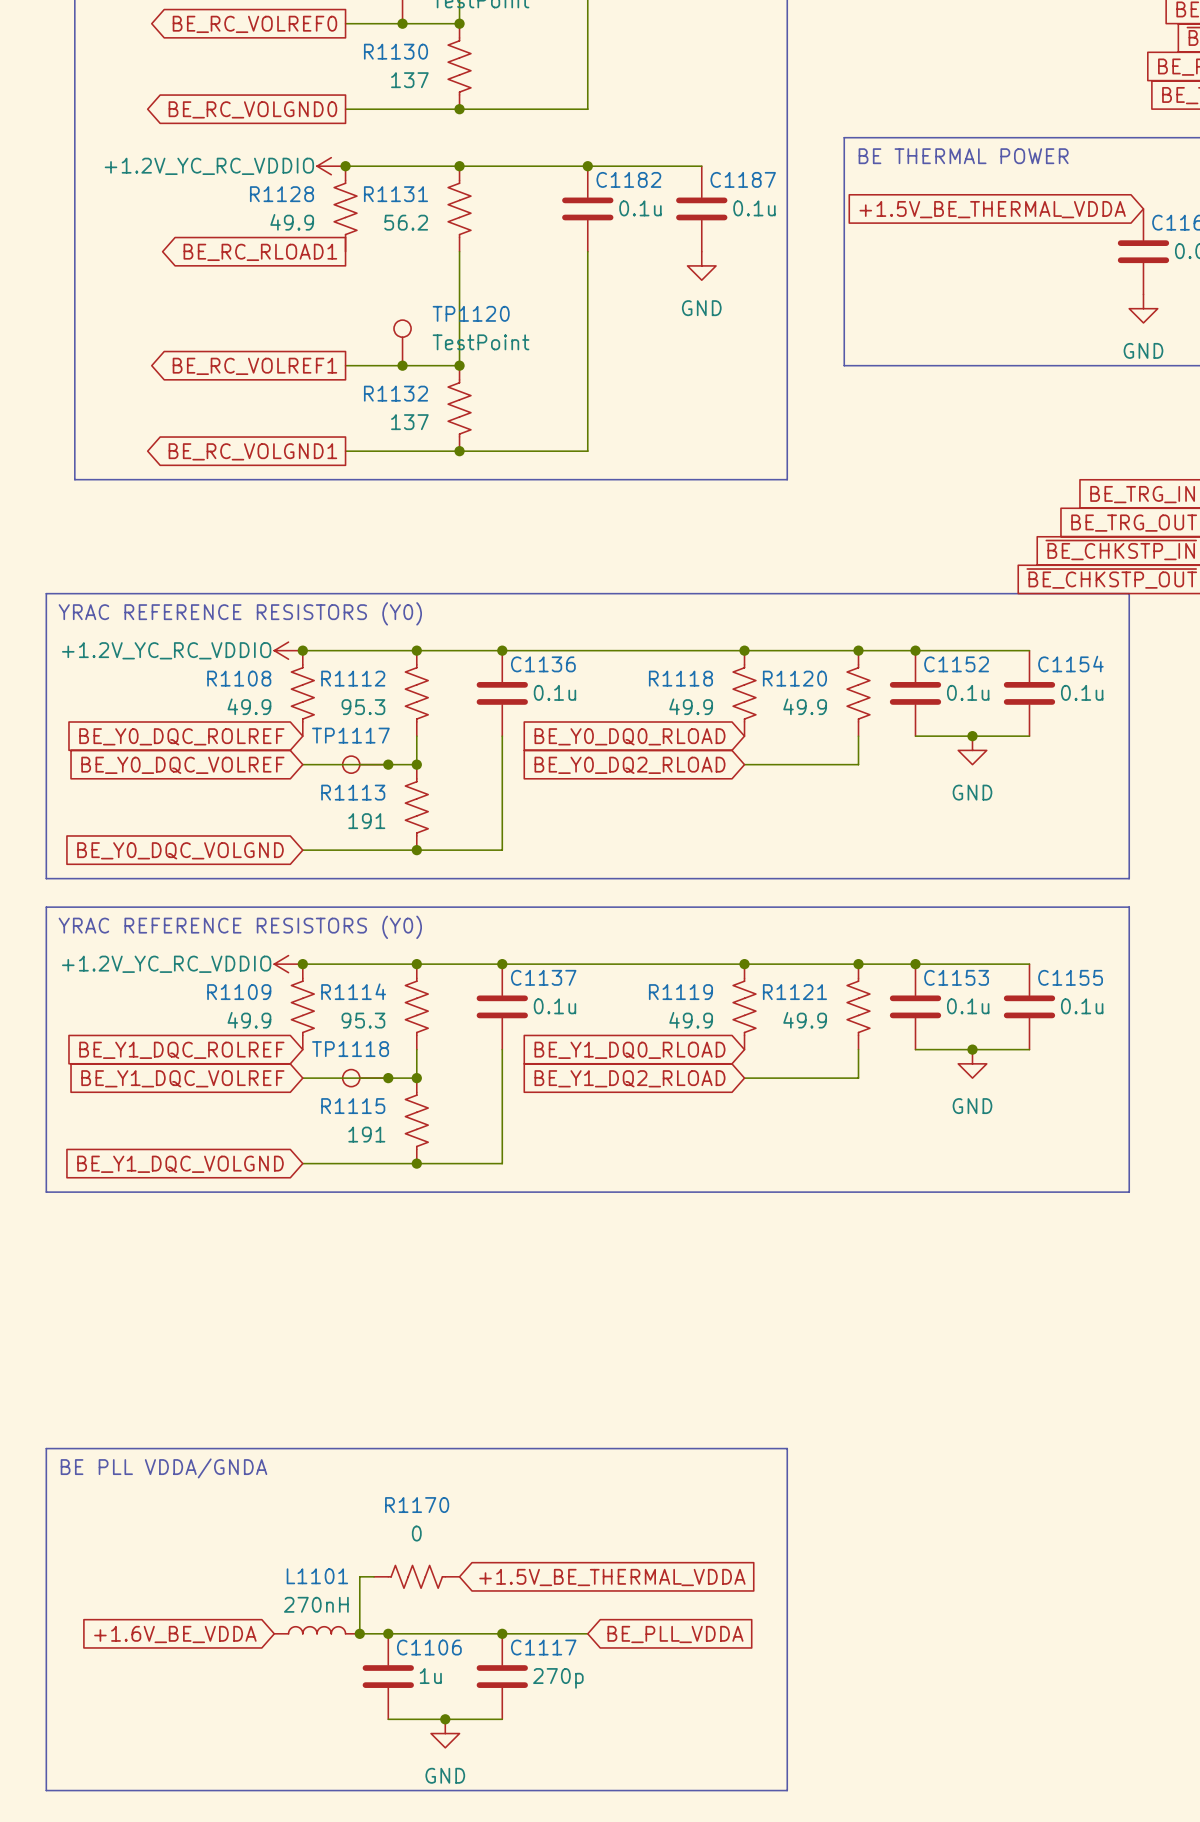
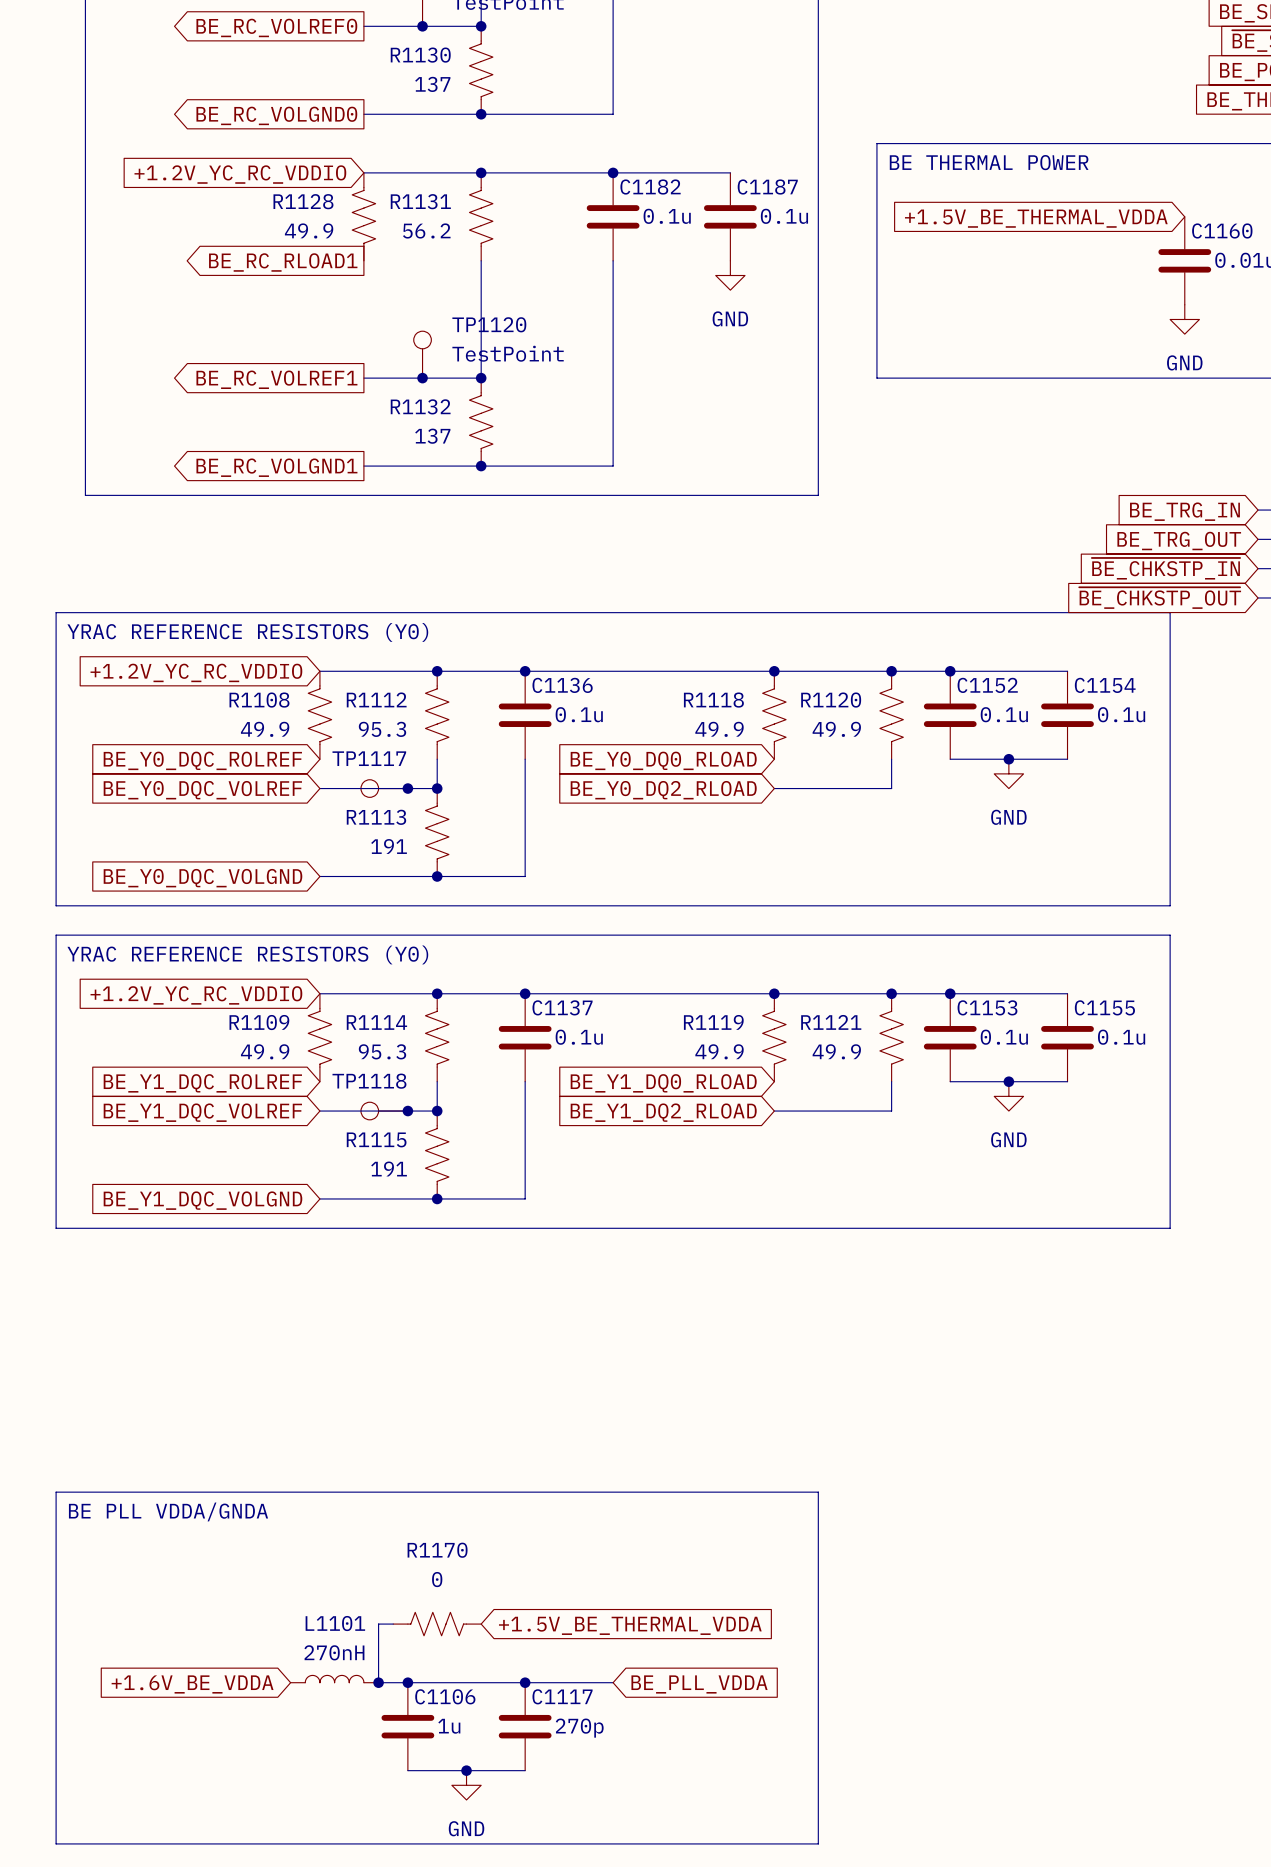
global label: none -> +1.2V_YC_RC_VDDIO (240, 174)
power symbol: +1.2V_YC_RC_VDDIO (331, 166) -> none
junction: (345, 166) -> none
power symbol: +1.2V_YC_RC_VDDIO (288, 650) -> none
junction: (302, 650) -> none
global label: none -> +1.2V_YC_RC_VDDIO (196, 672)
global label: none -> +1.2V_YC_RC_VDDIO (196, 995)
power symbol: +1.2V_YC_RC_VDDIO (288, 964) -> none
junction: (302, 964) -> none

